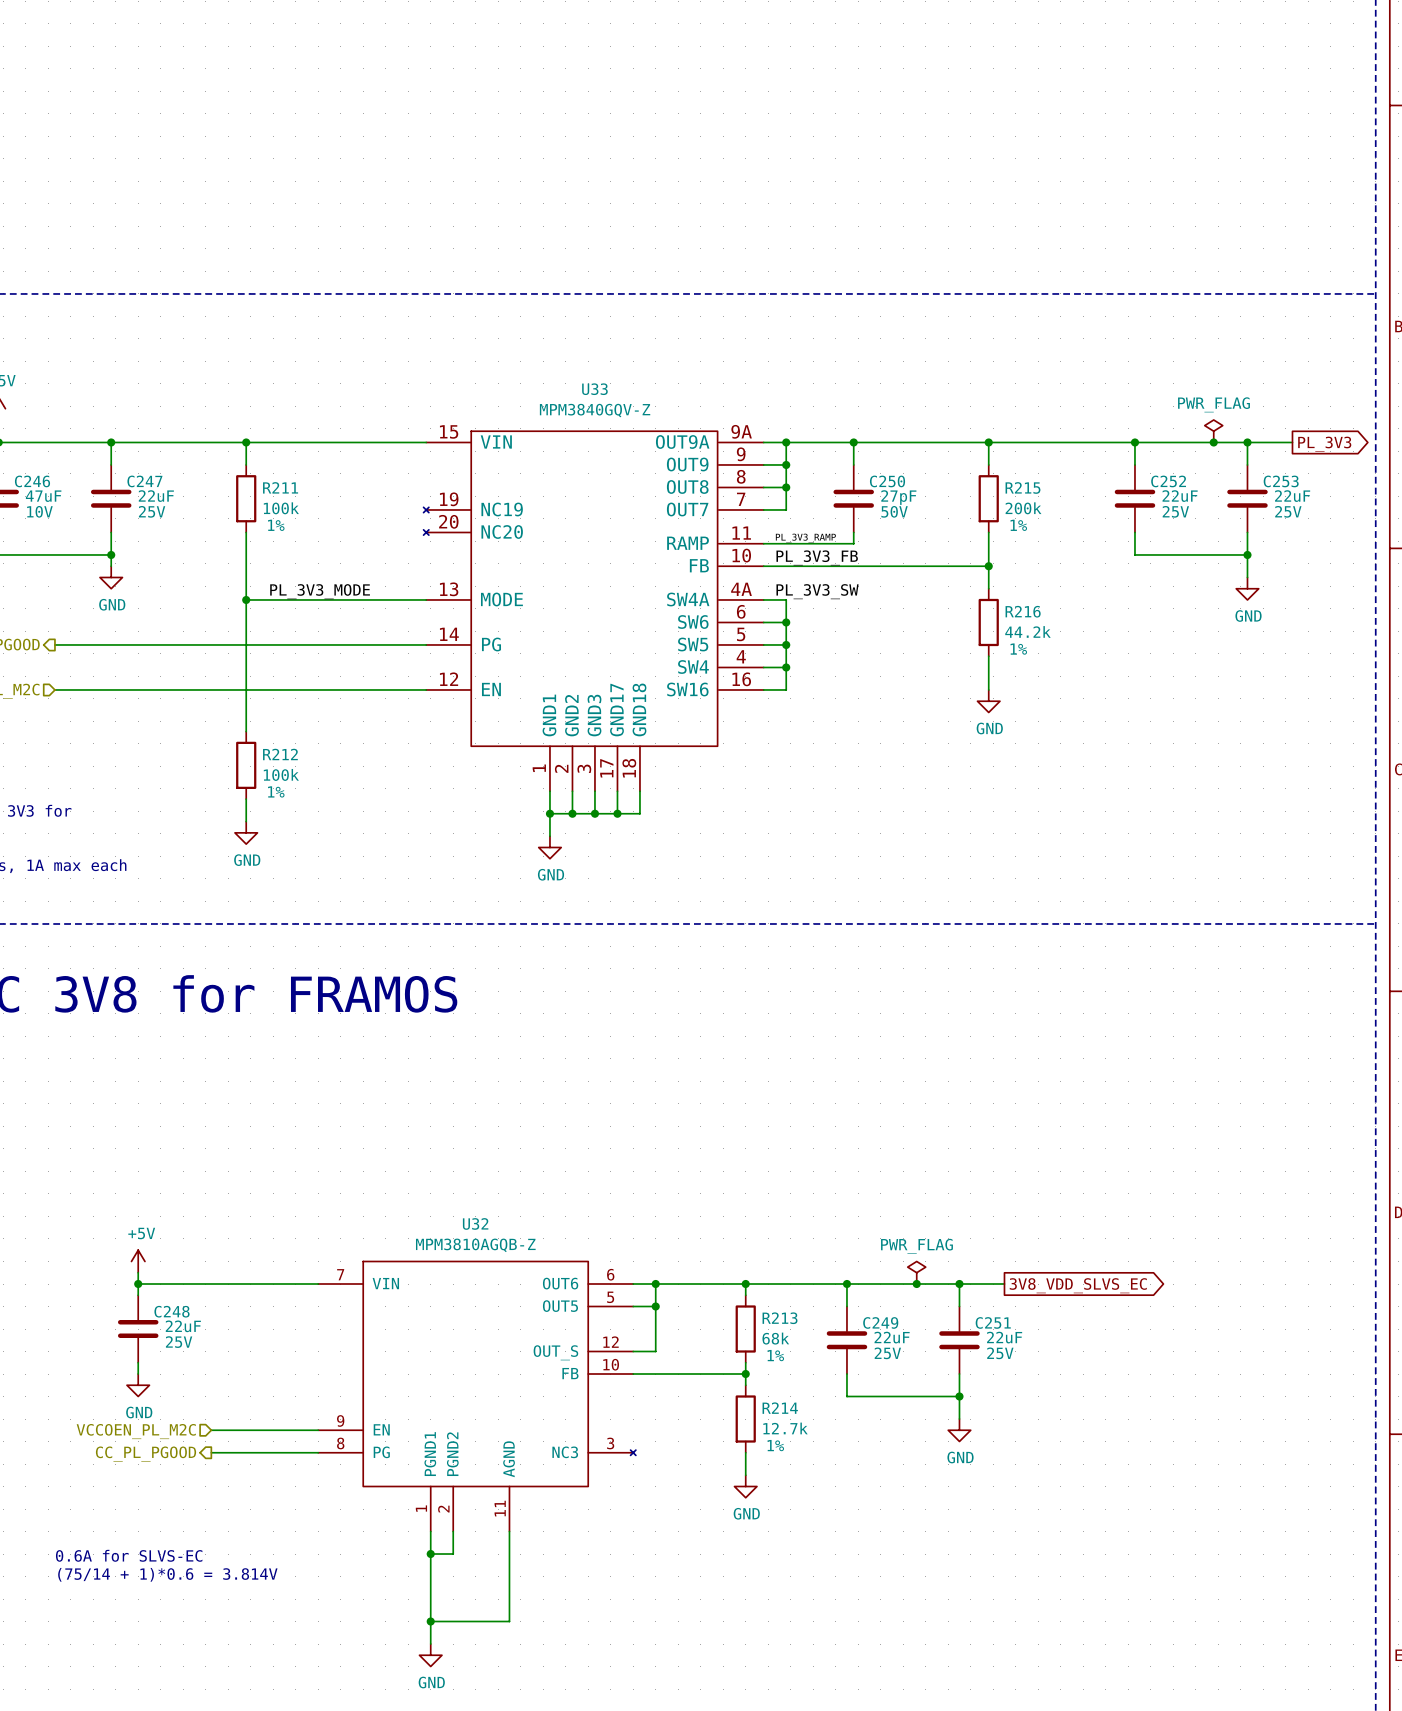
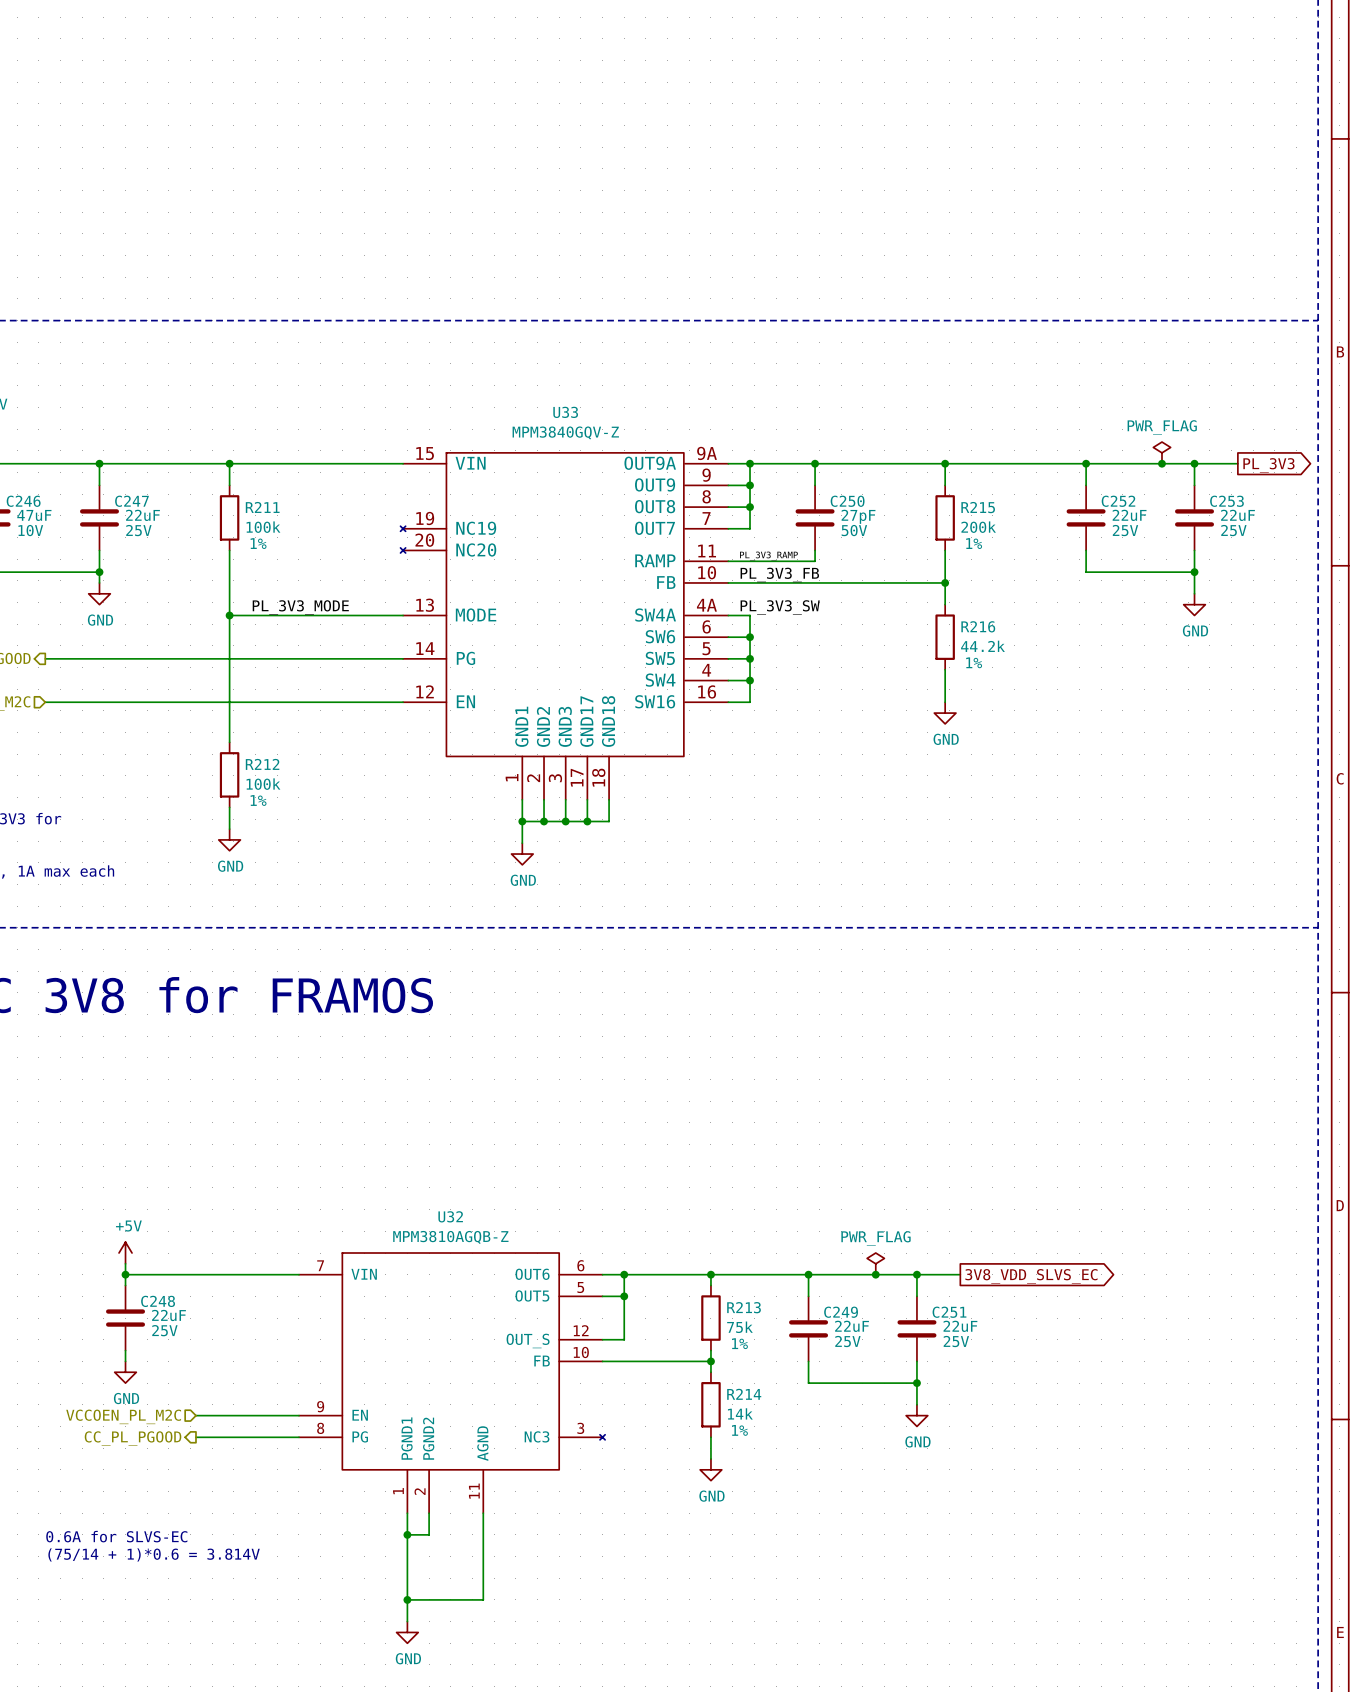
R213 value: 68k (775, 1338) -> 75k (739, 1327)
R214 value: 12.7k (785, 1428) -> 14k (740, 1413)

